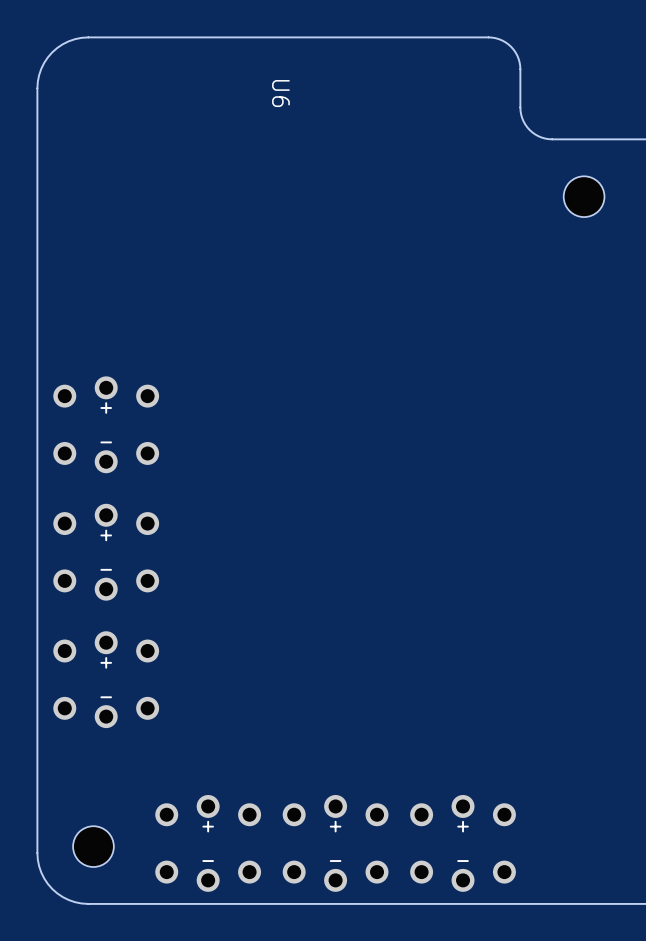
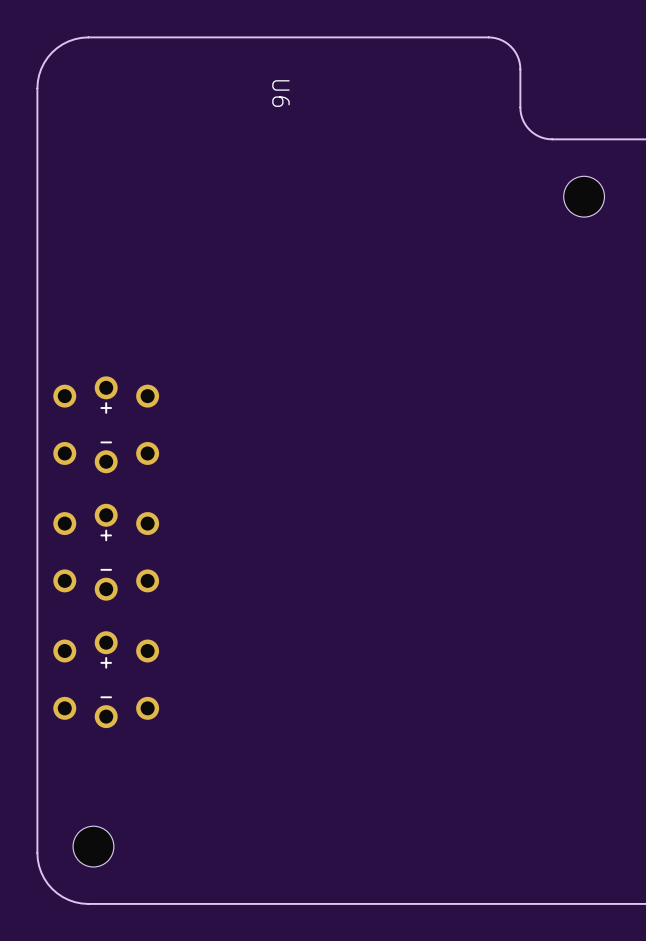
part: (208, 843) -> none
part: (335, 843) -> none
part: (463, 843) -> none

